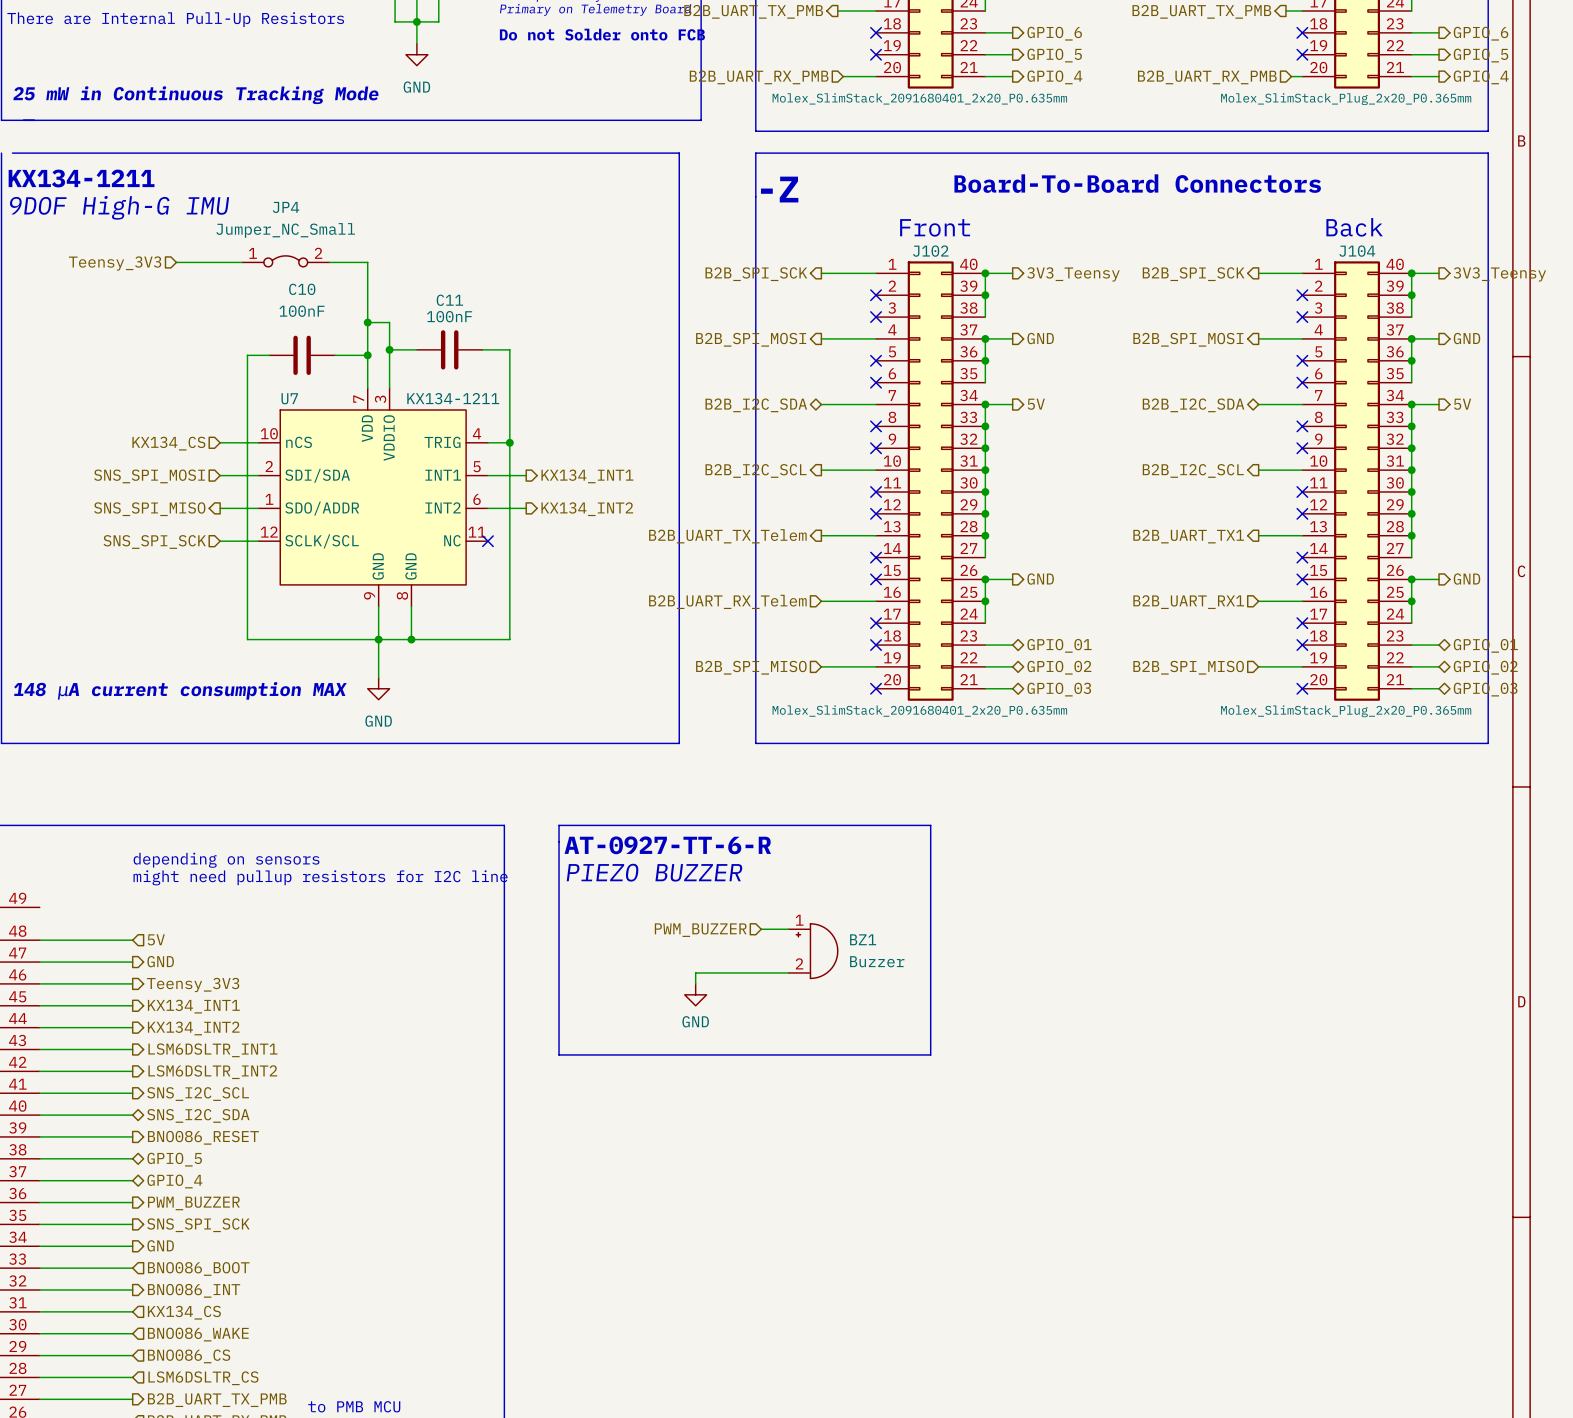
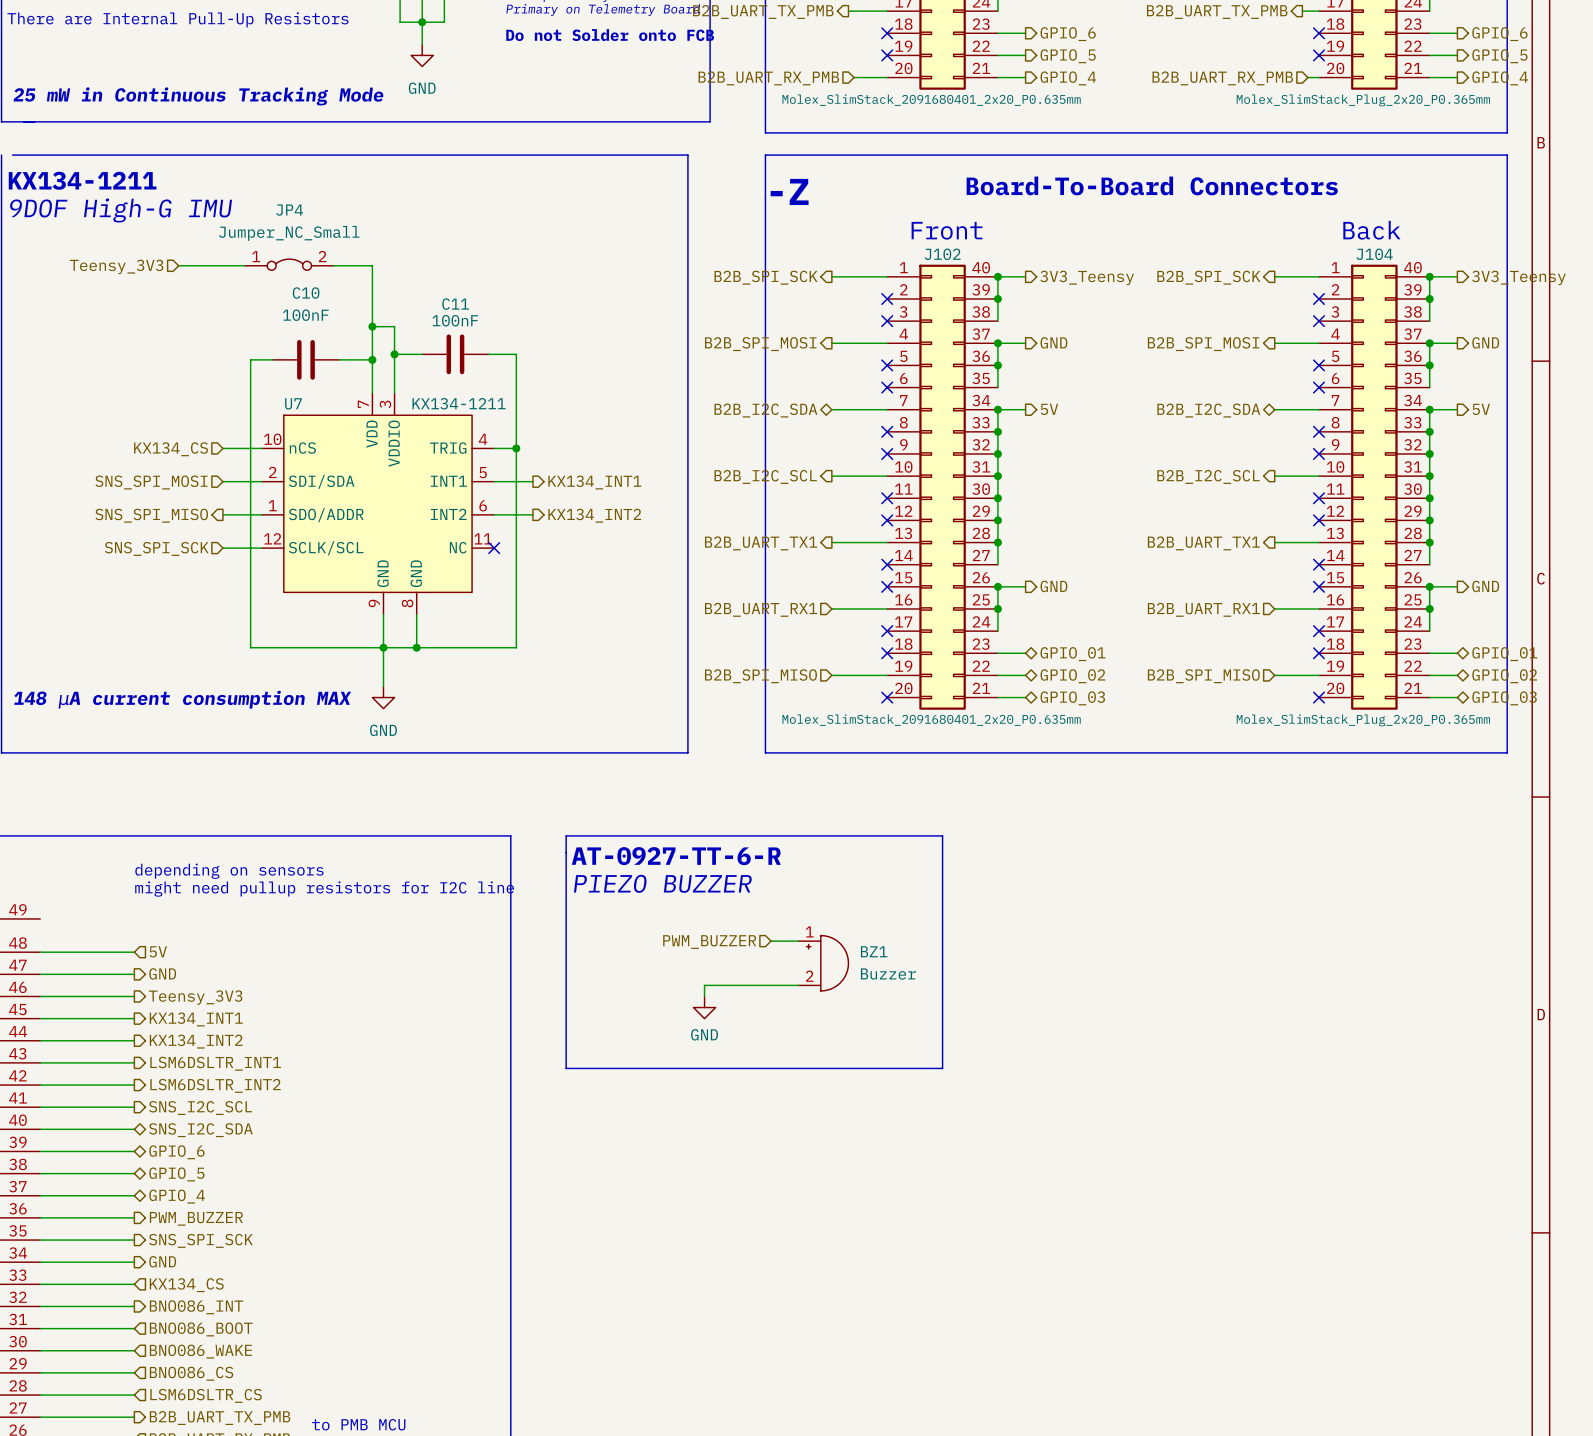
hierarchical label: B2B_UART_TX_Telem (727, 536) -> B2B_UART_TX1 (761, 543)
hierarchical label: B2B_UART_RX_Telem (727, 601) -> B2B_UART_RX1 (761, 609)
hierarchical label shape: output (203, 1137) -> bidirectional (176, 1152)
hierarchical label: BNO086_RESET (203, 1137) -> GPIO_6 (176, 1152)
hierarchical label: BNO086_BOOT (198, 1268) -> KX134_CS (186, 1285)
hierarchical label: KX134_CS (184, 1312) -> BNO086_BOOT (201, 1329)

